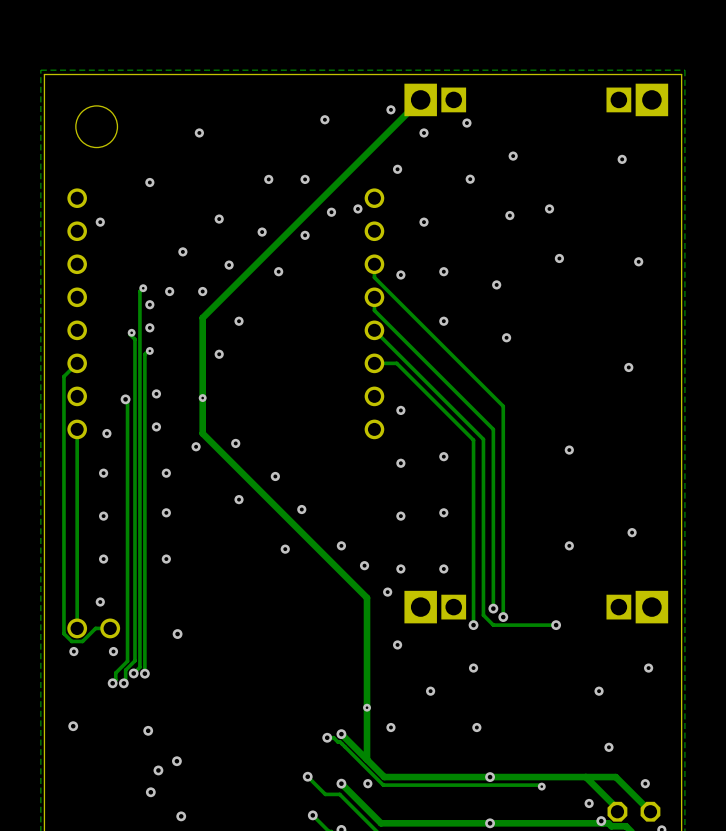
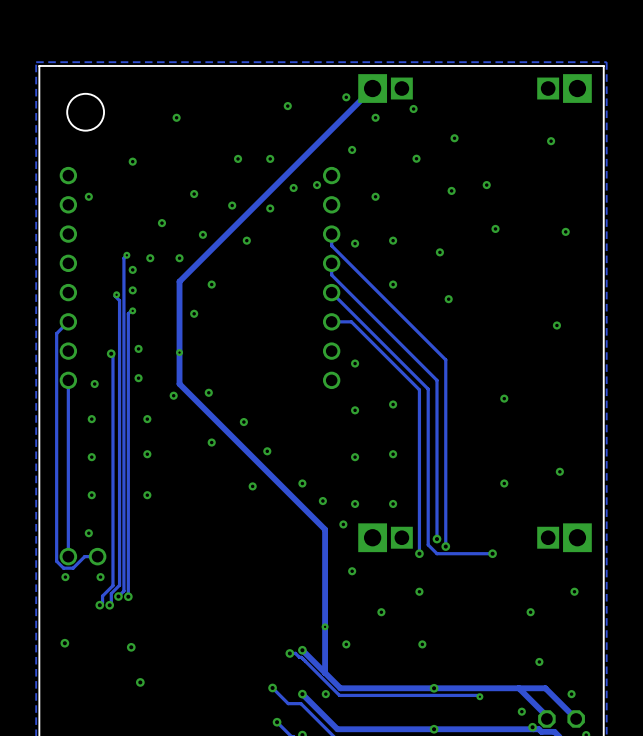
via: (177, 634) -> none
via: (176, 761) -> none
via: (150, 792) -> none
via: (181, 816) -> none

